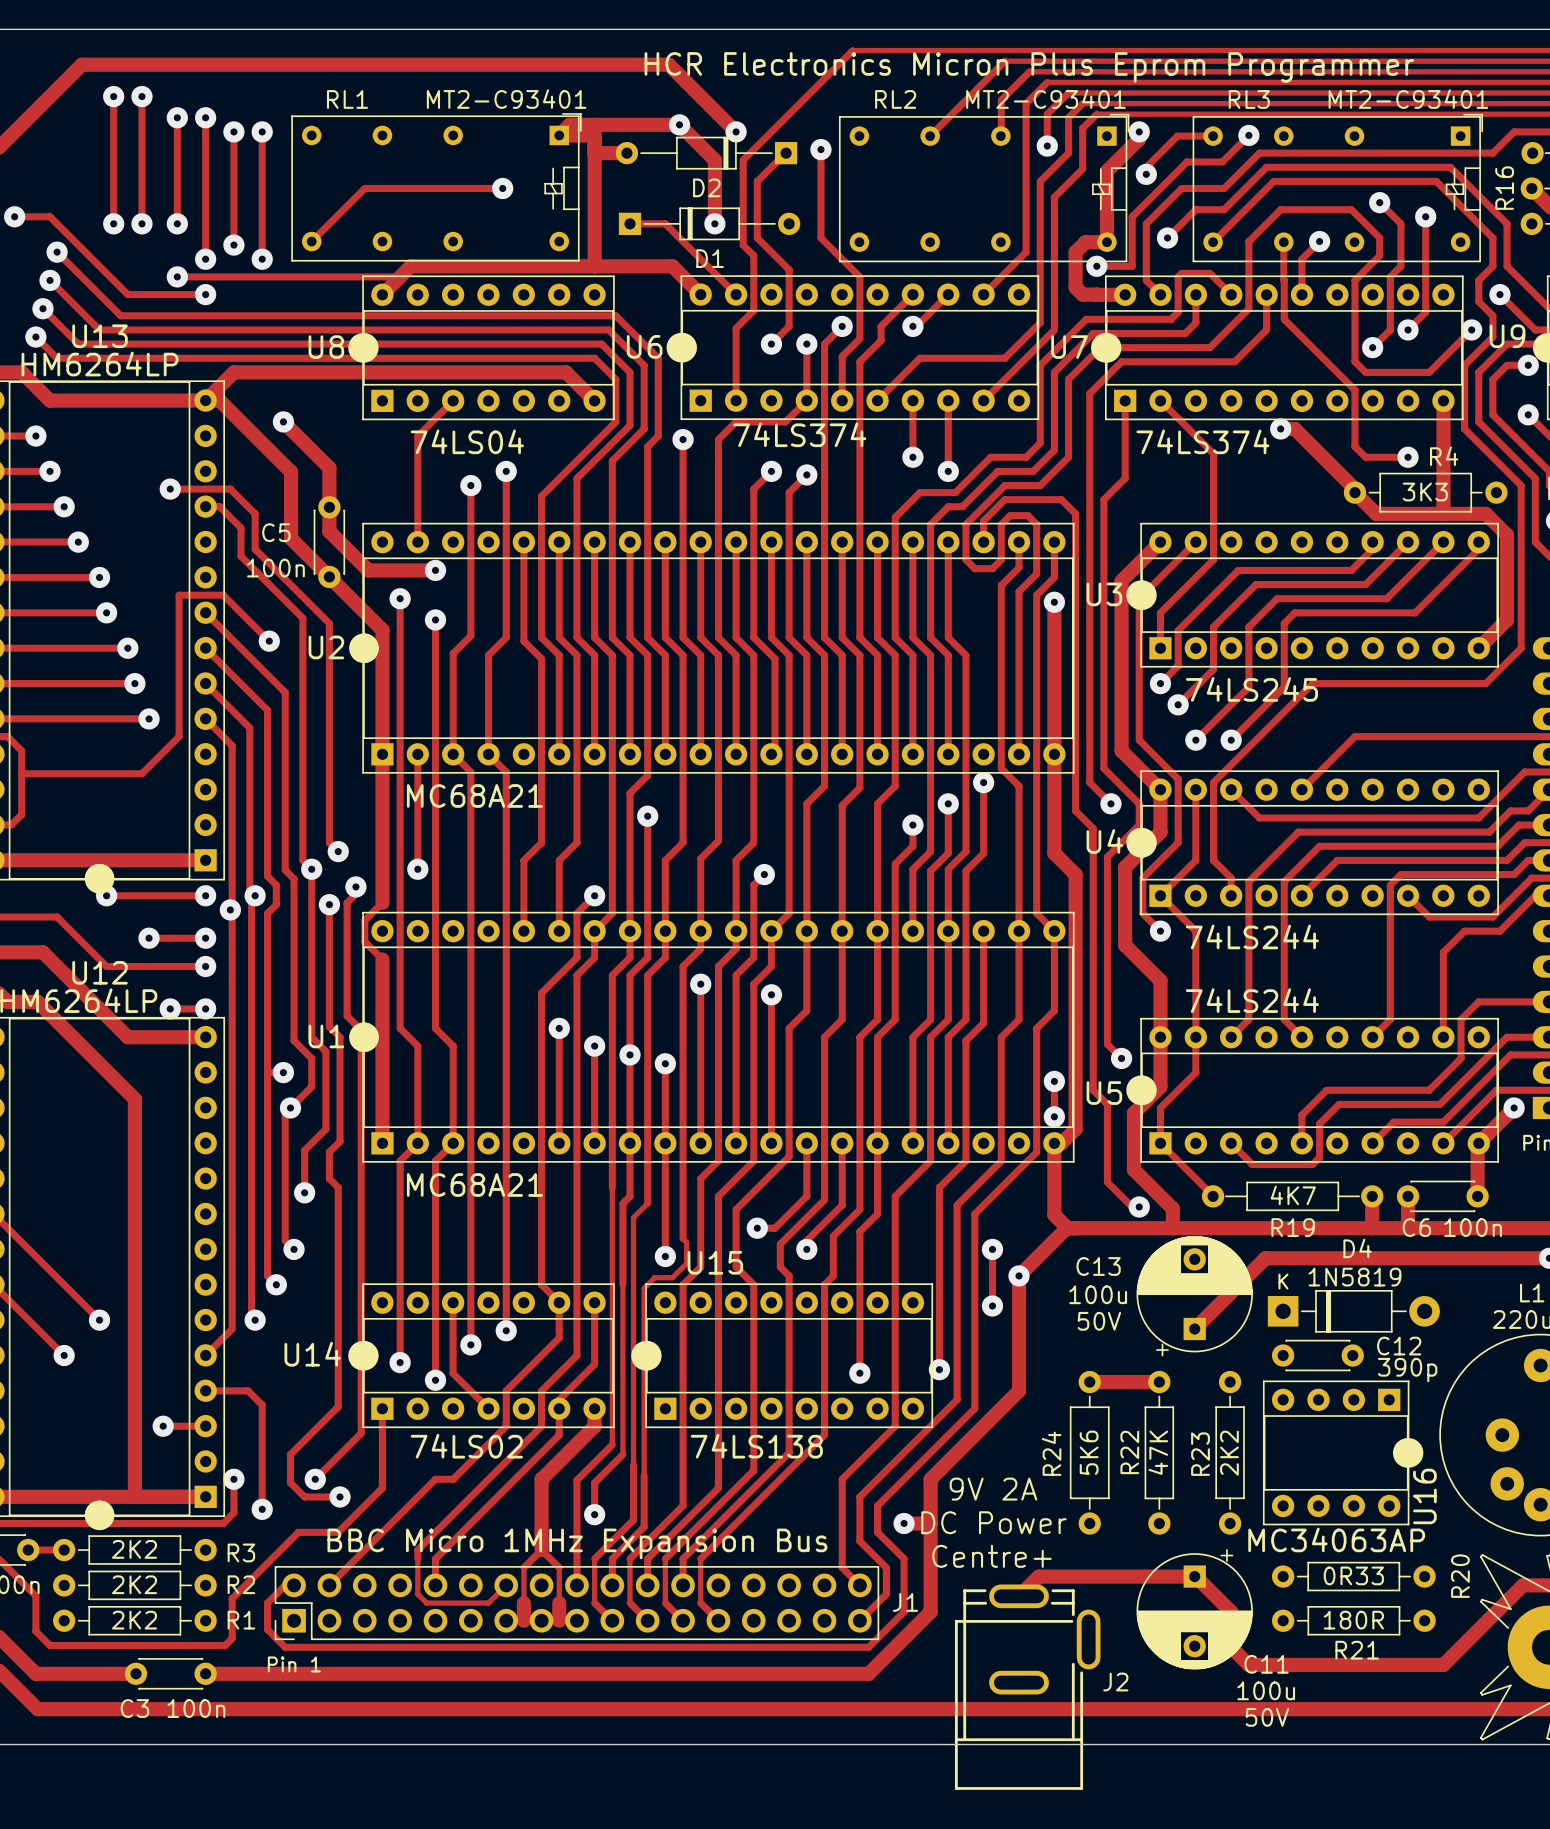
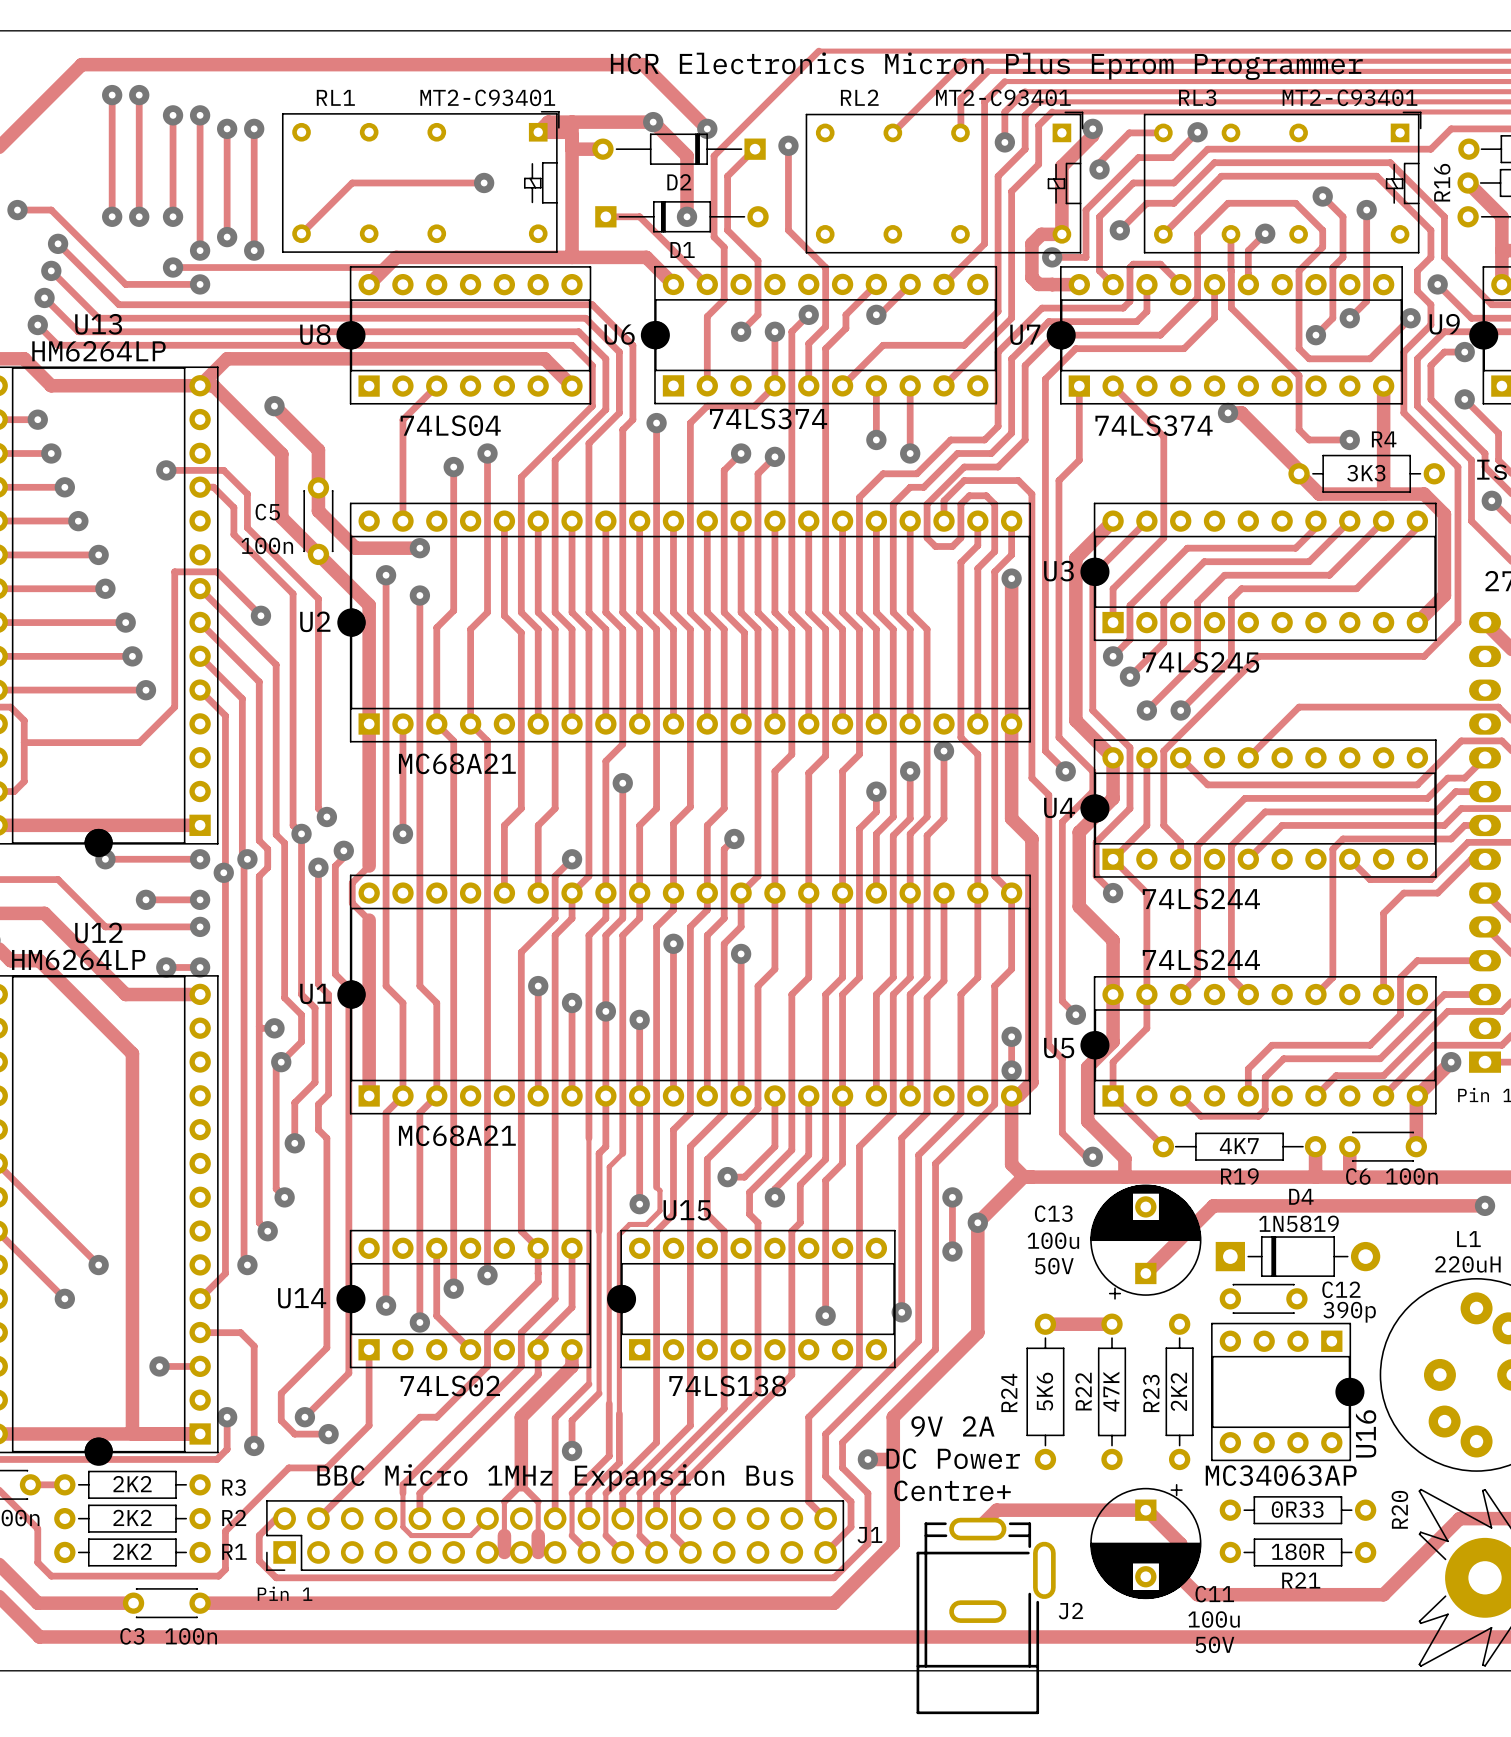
D4 text: K (1283, 1281) -> none

